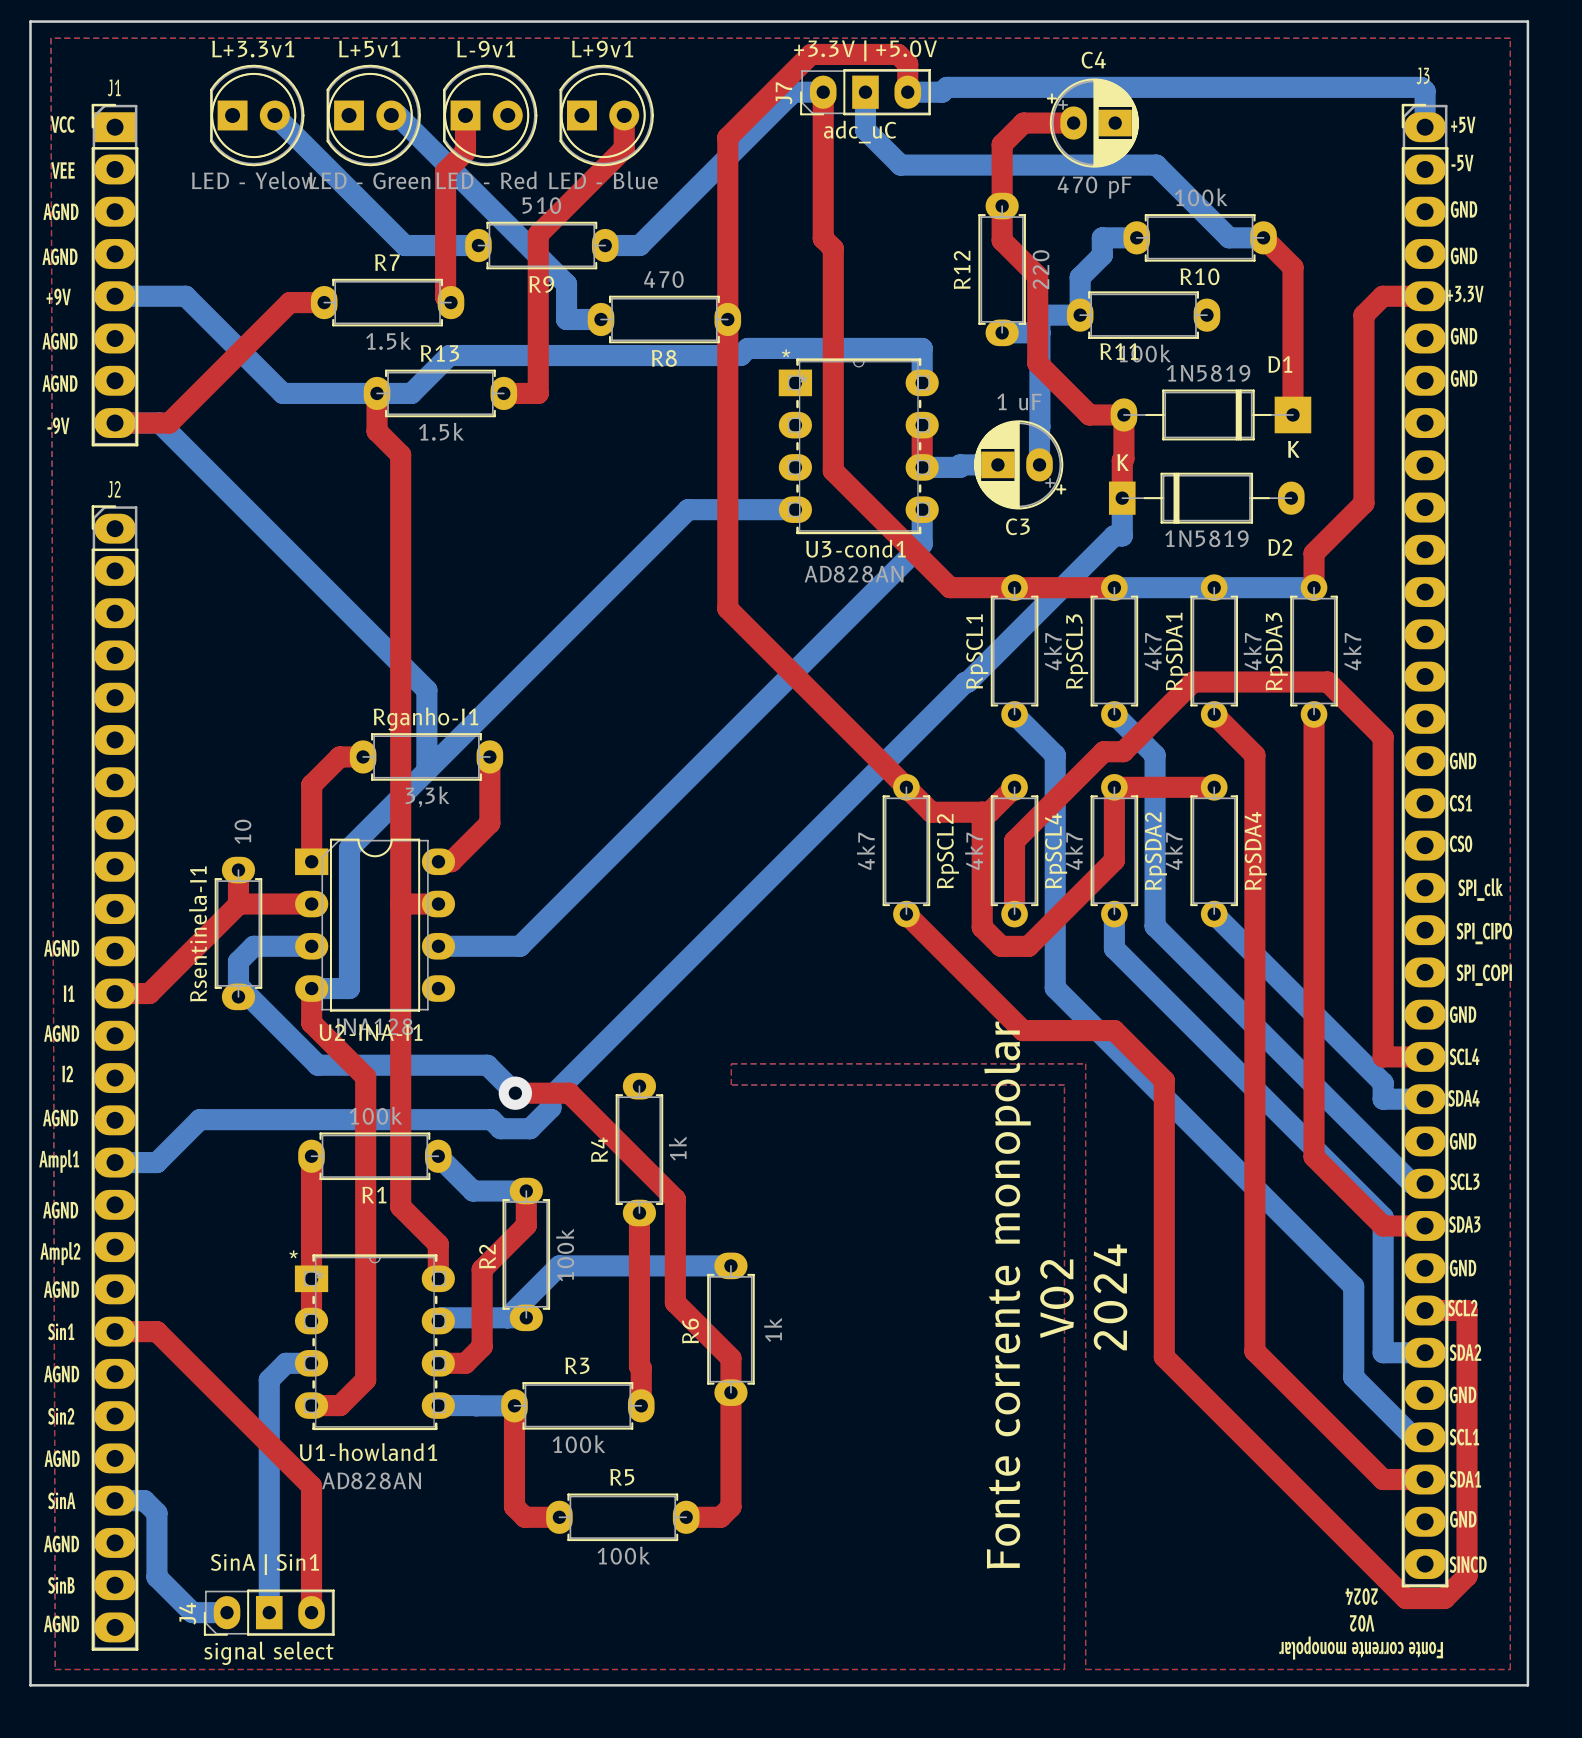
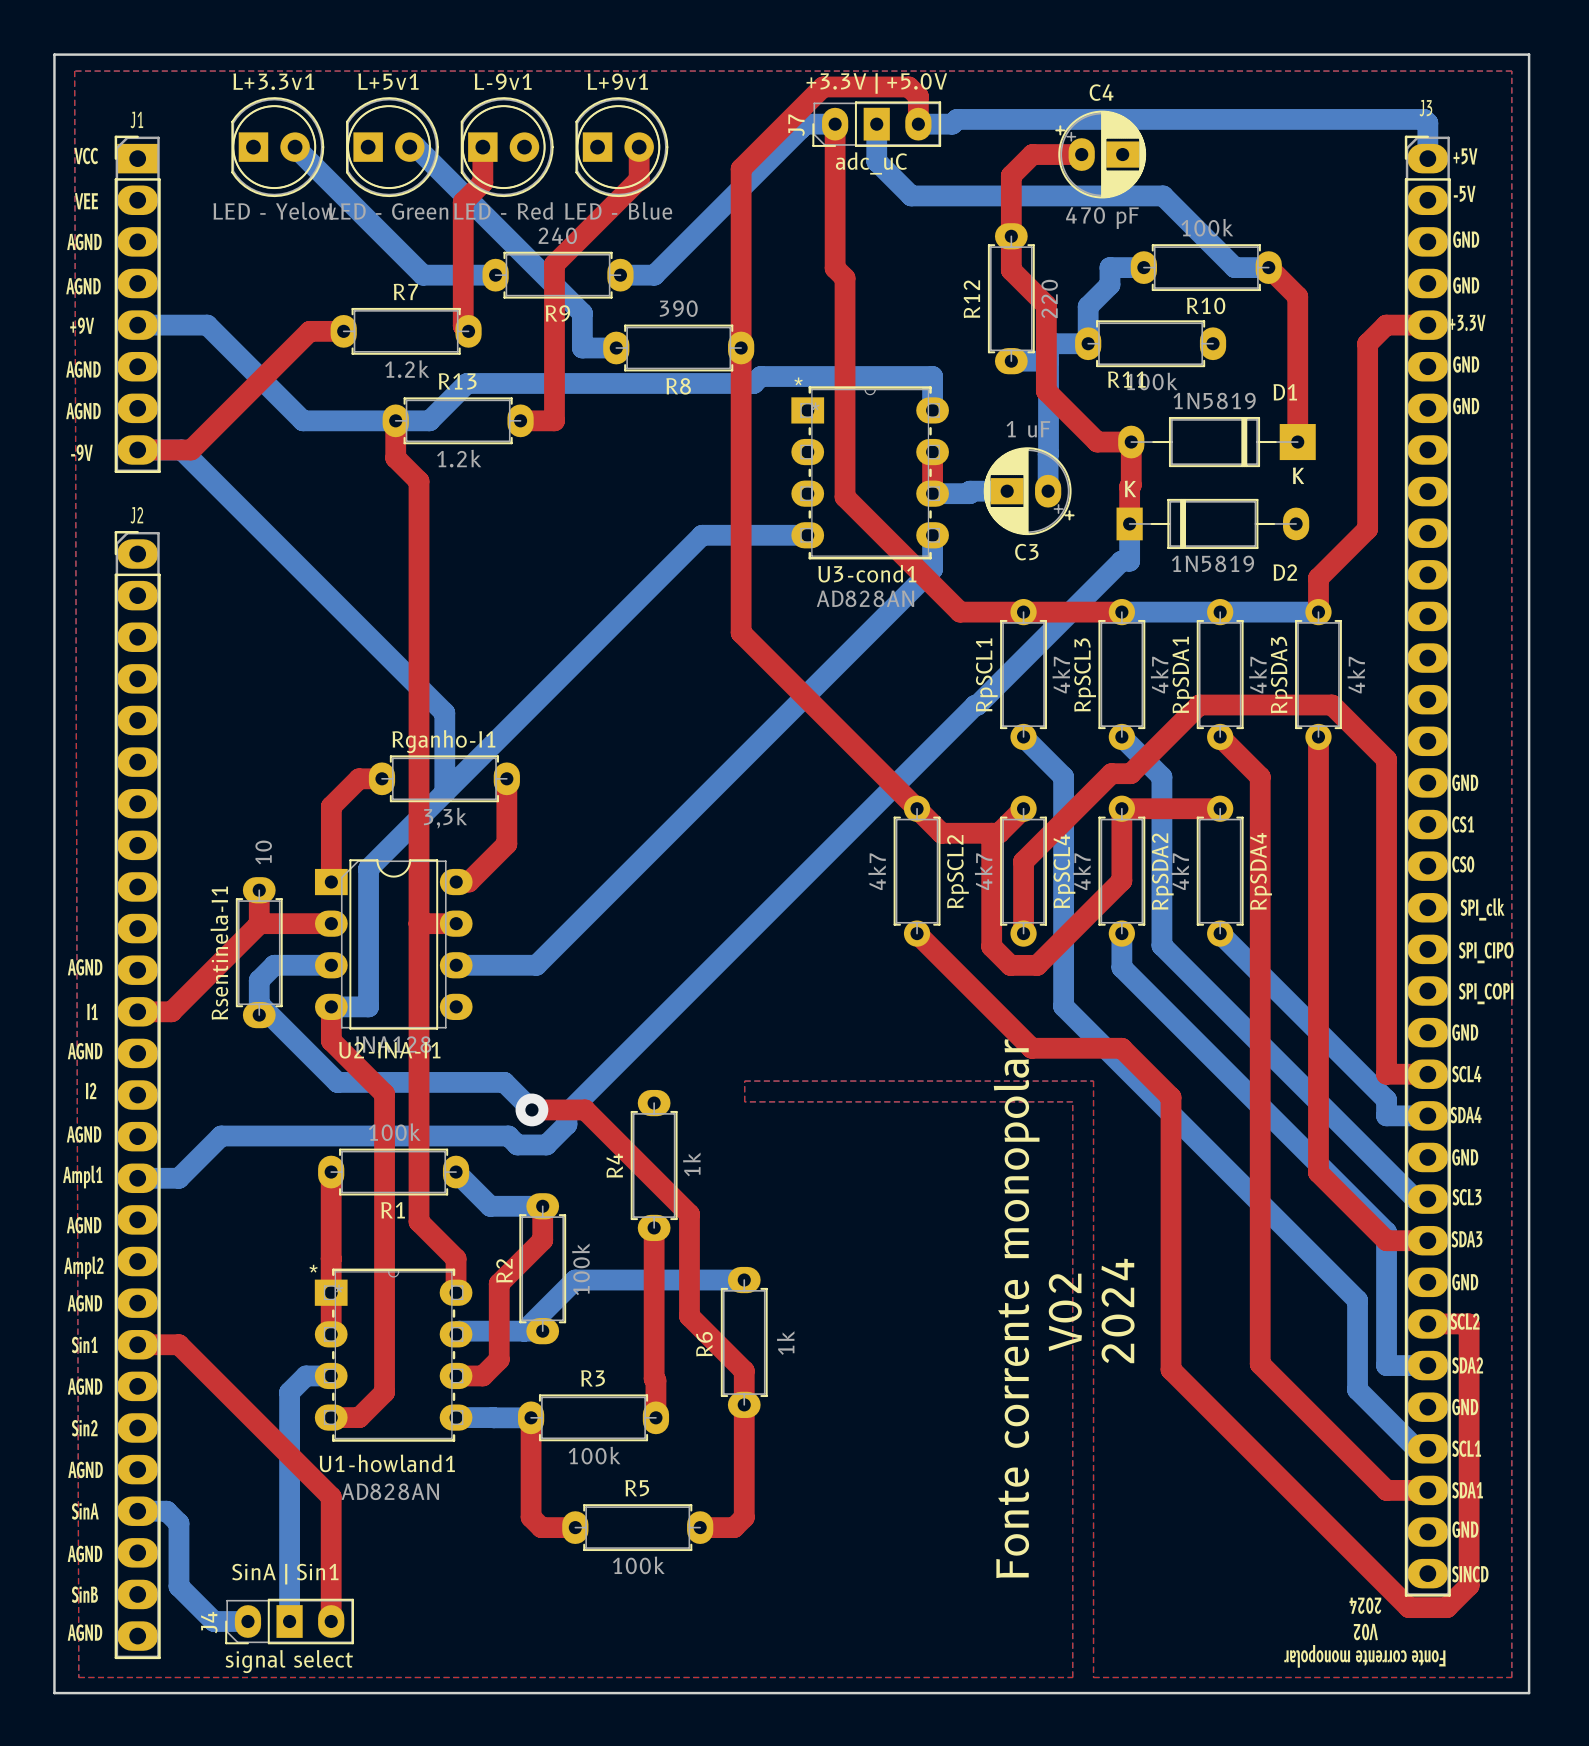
R9 value: 510 (541, 205) -> 240 (557, 235)
R8 value: 470 (663, 279) -> 390 (678, 308)
R7 value: 1.5k (388, 340) -> 1.2k (407, 369)
R13 value: 1.5k (441, 431) -> 1.2k (459, 458)

